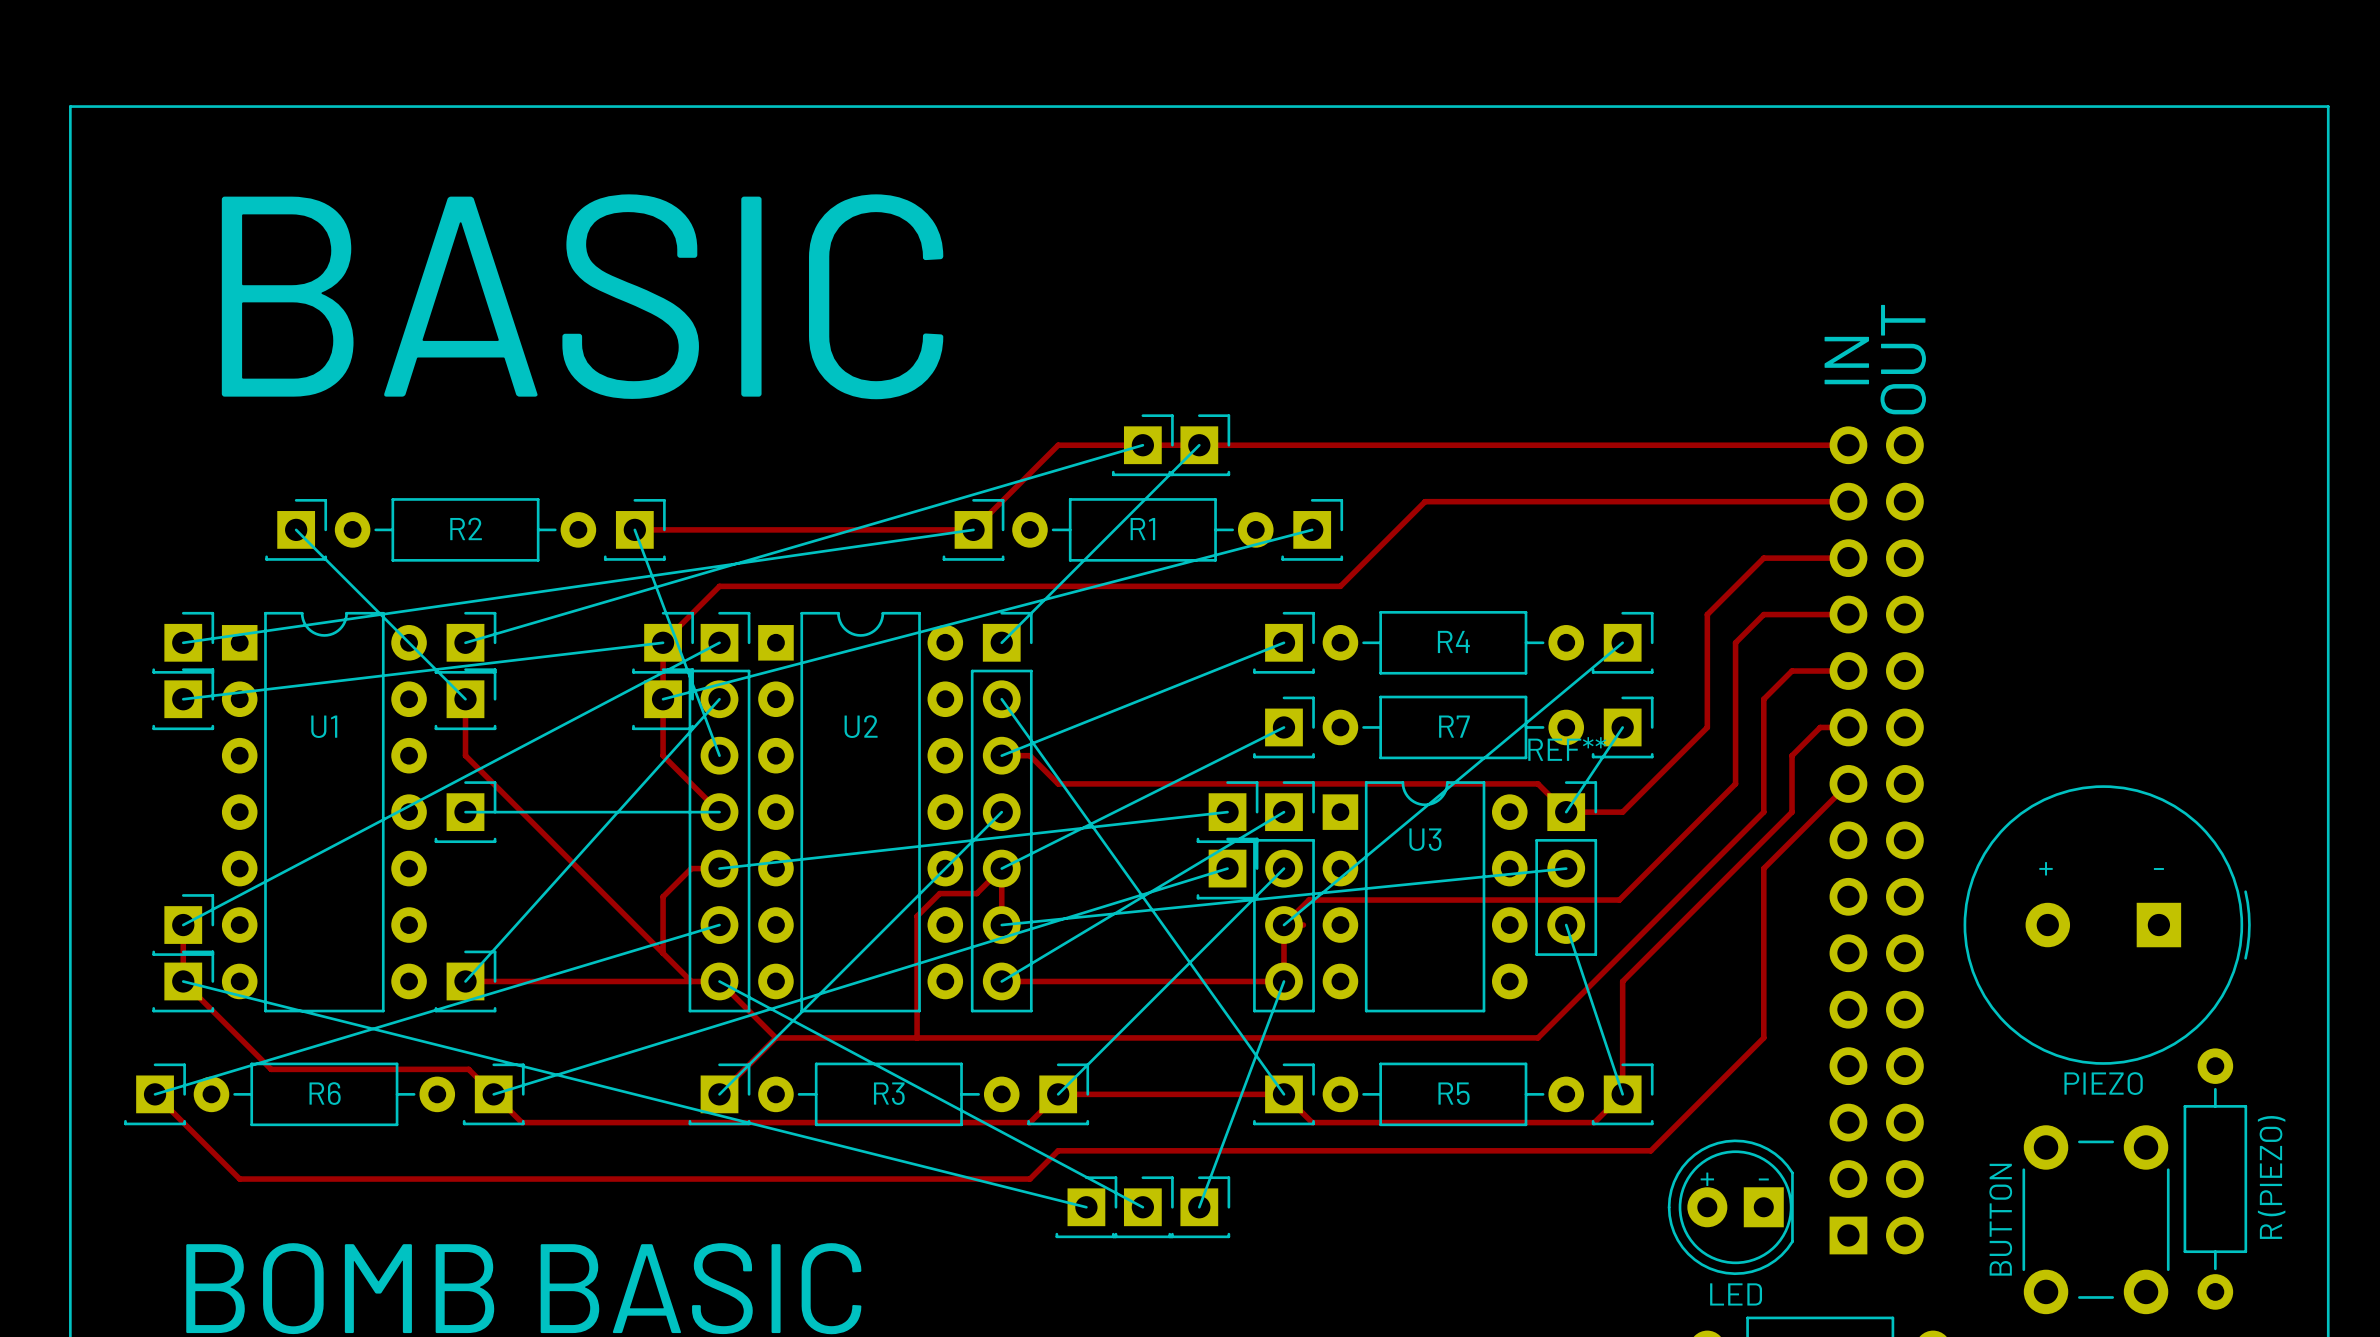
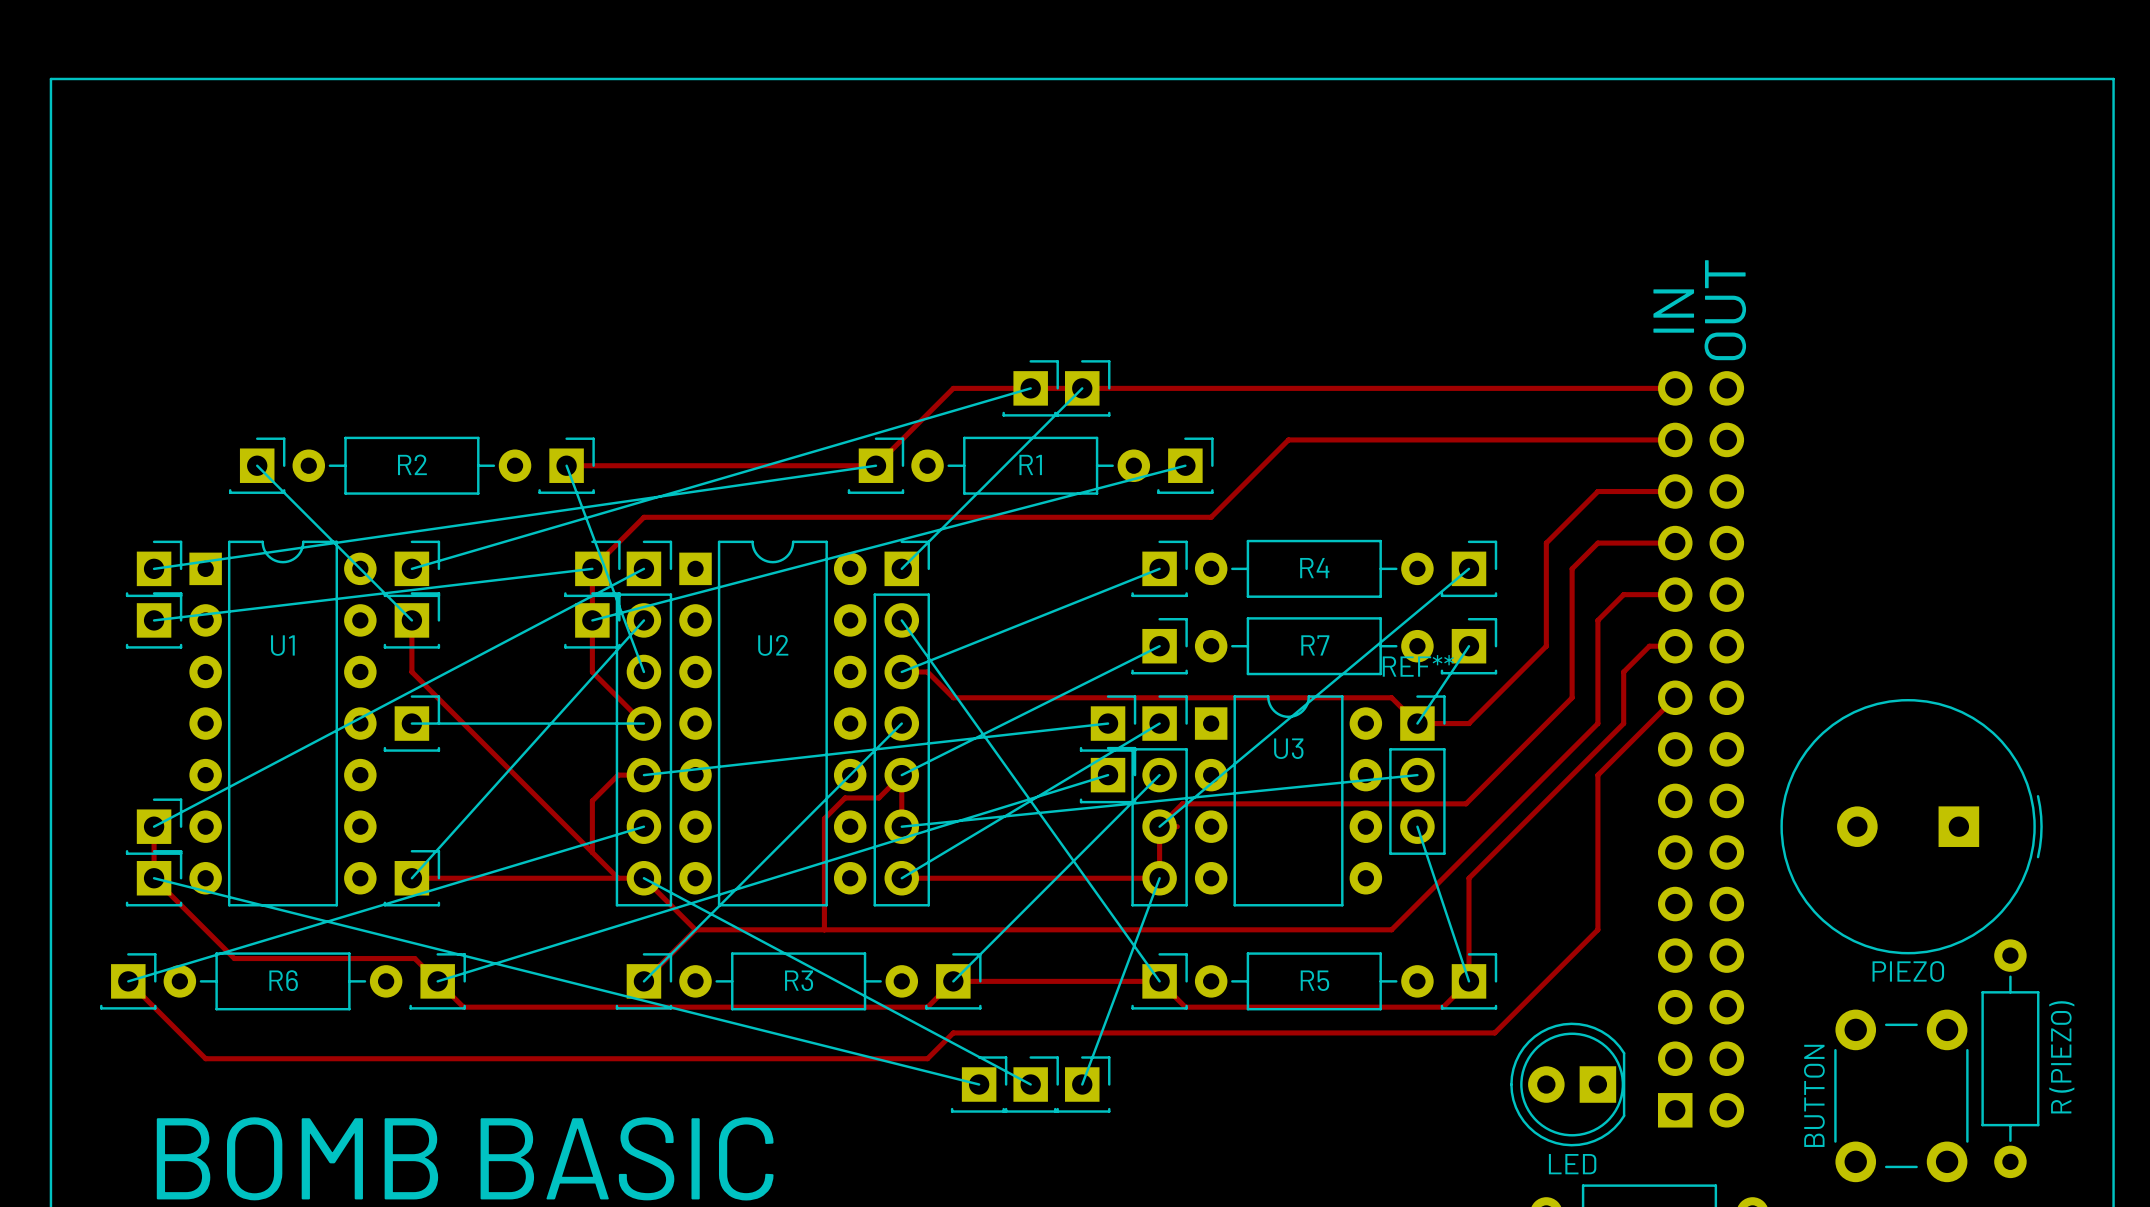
text: BASIC (582, 296) -> none
text: + (2046, 868) -> none
text: - (2158, 868) -> none
text: + (1707, 1179) -> none
text: - (1763, 1179) -> none

